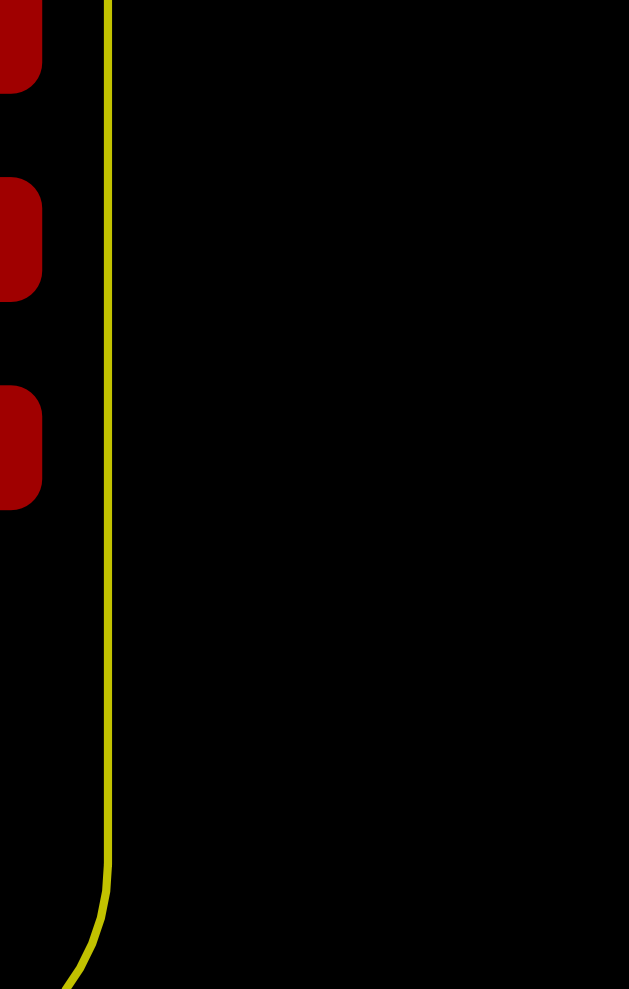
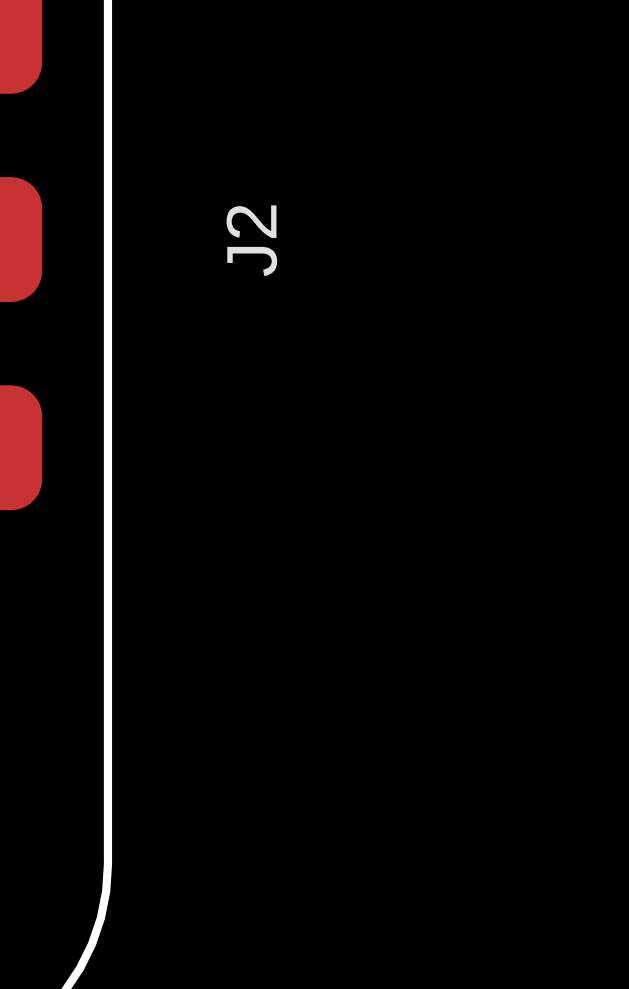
J2 name: none -> J2 (251, 240)

